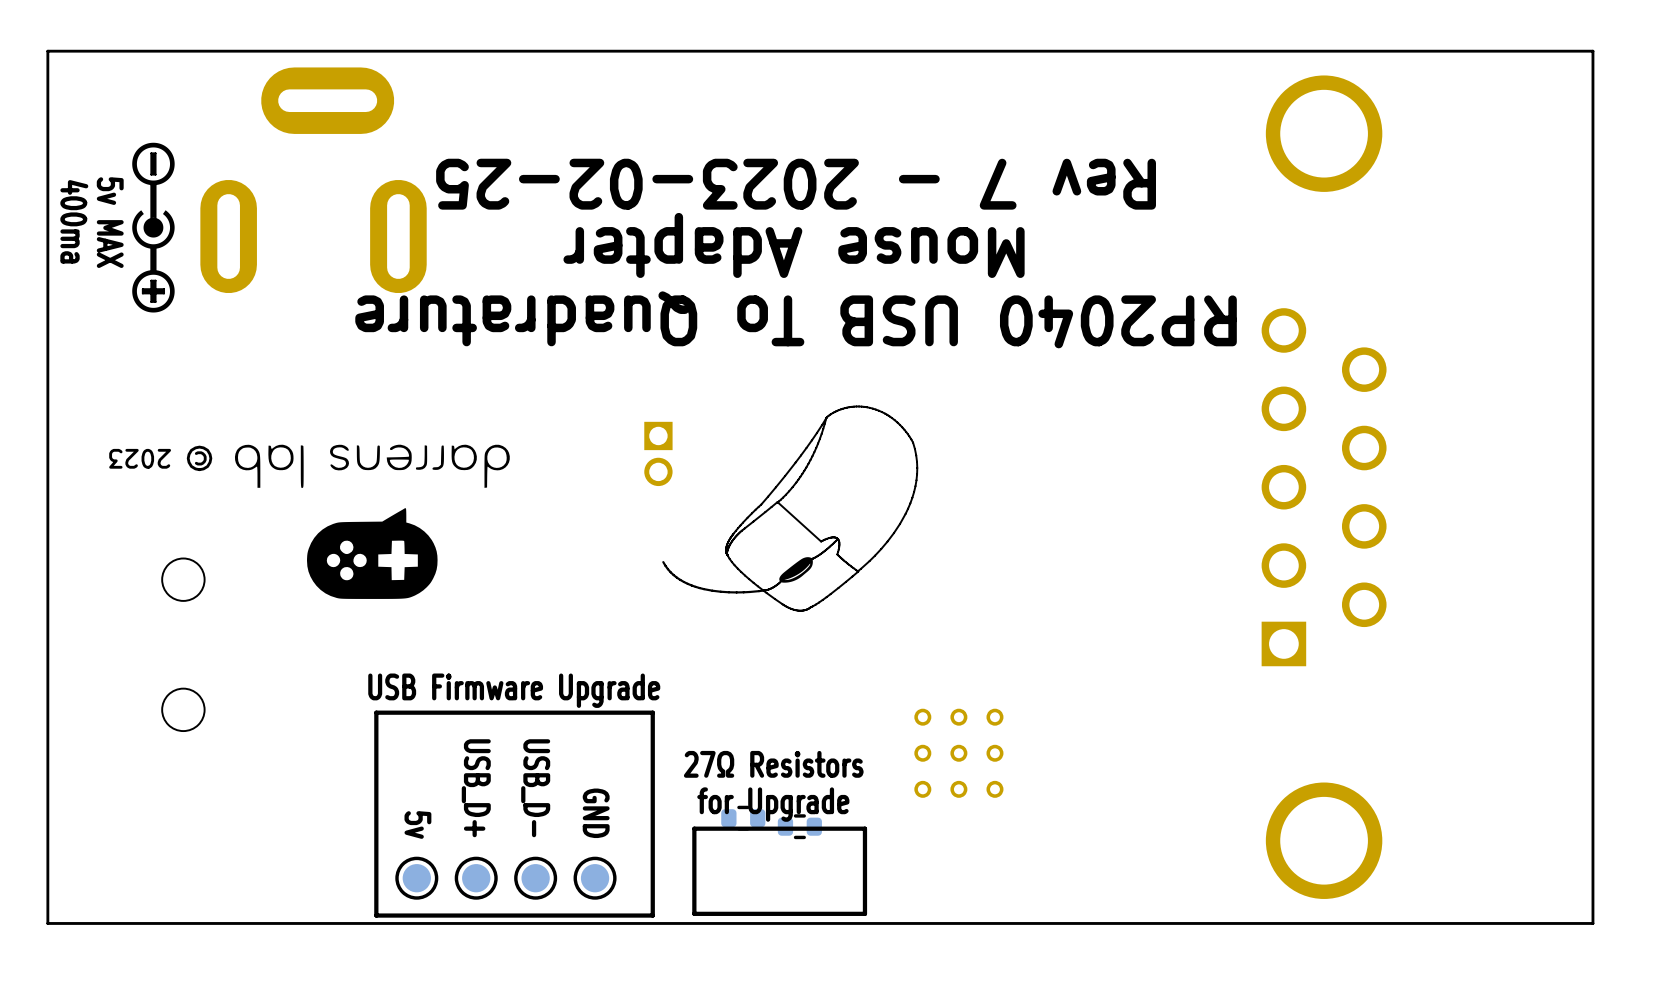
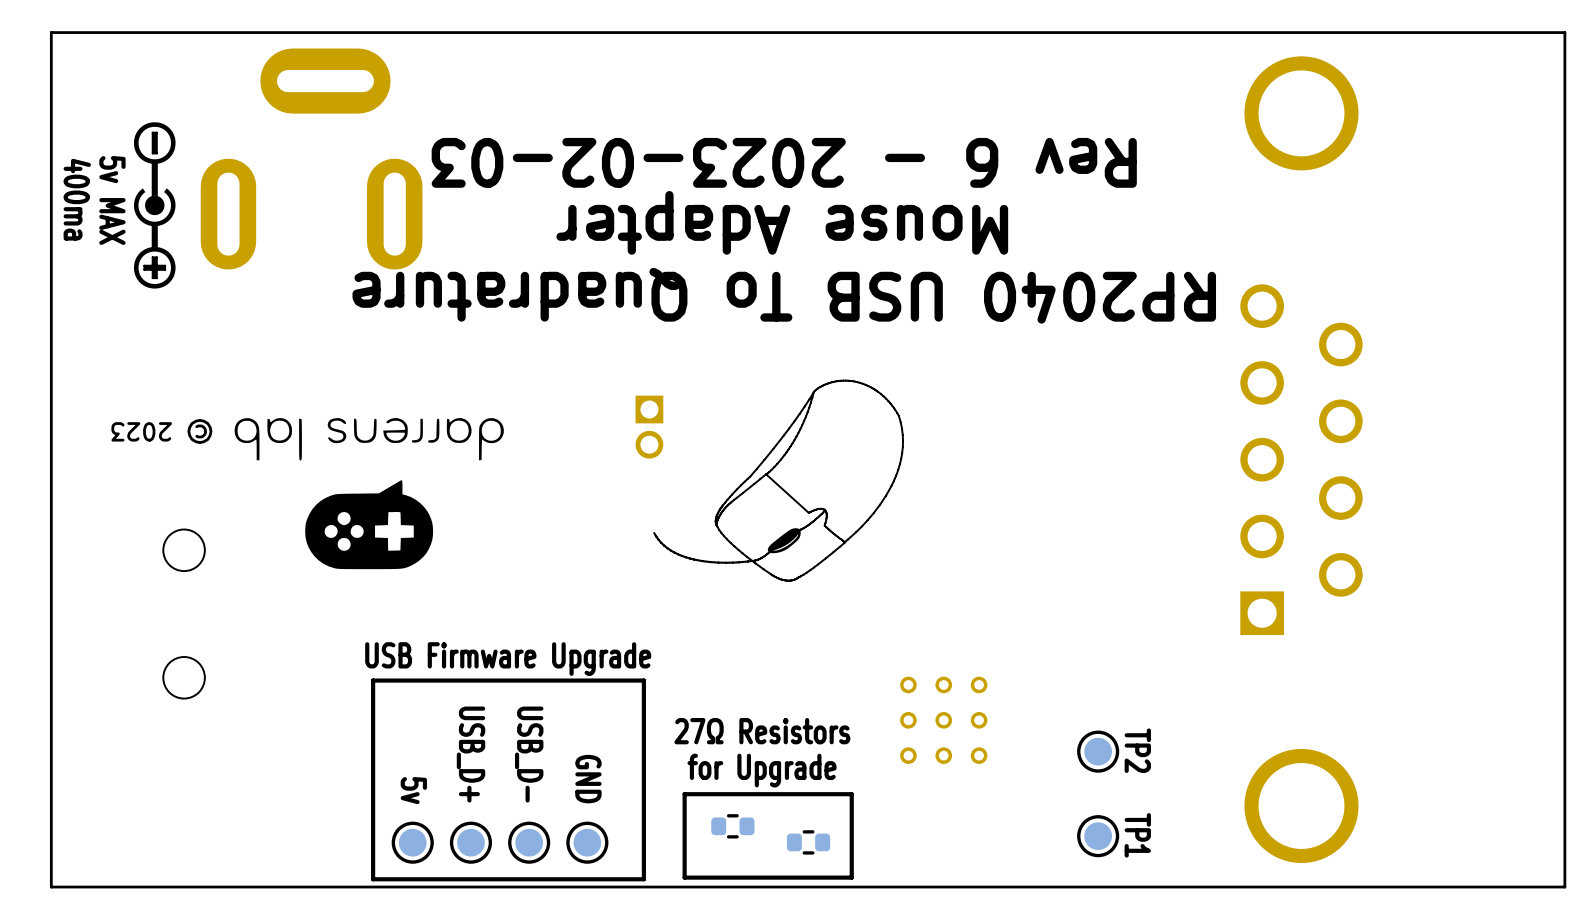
text: Rev 7 - 2023-02-25 (796, 184) -> Rev 6 - 2023-02-03 (784, 162)
TP2: none -> (1098, 751)
part: (743, 818) -> none
part: (799, 826) -> none
part: none -> (732, 826)
TP1: none -> (1098, 836)
part: none -> (808, 842)

